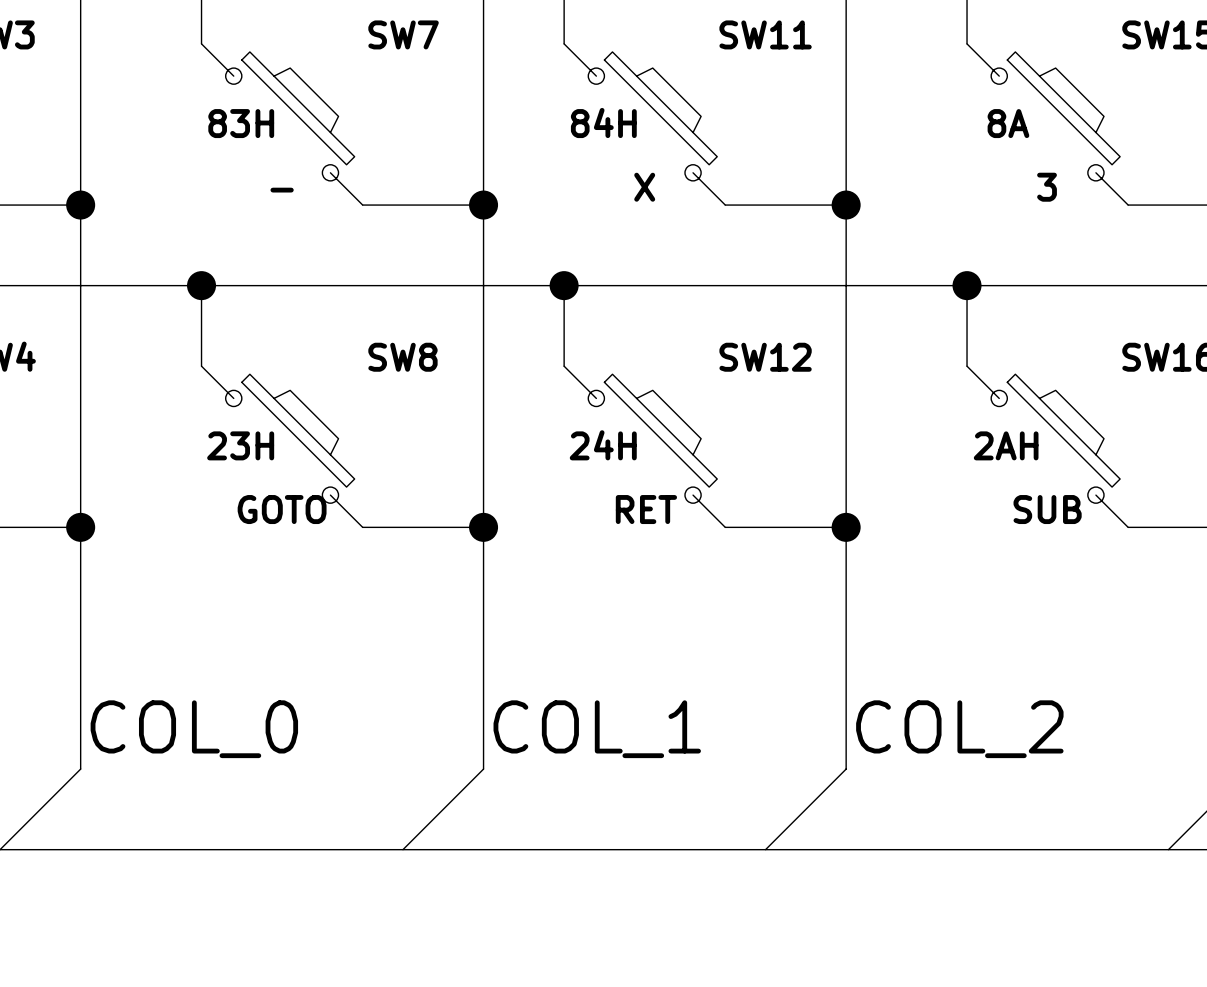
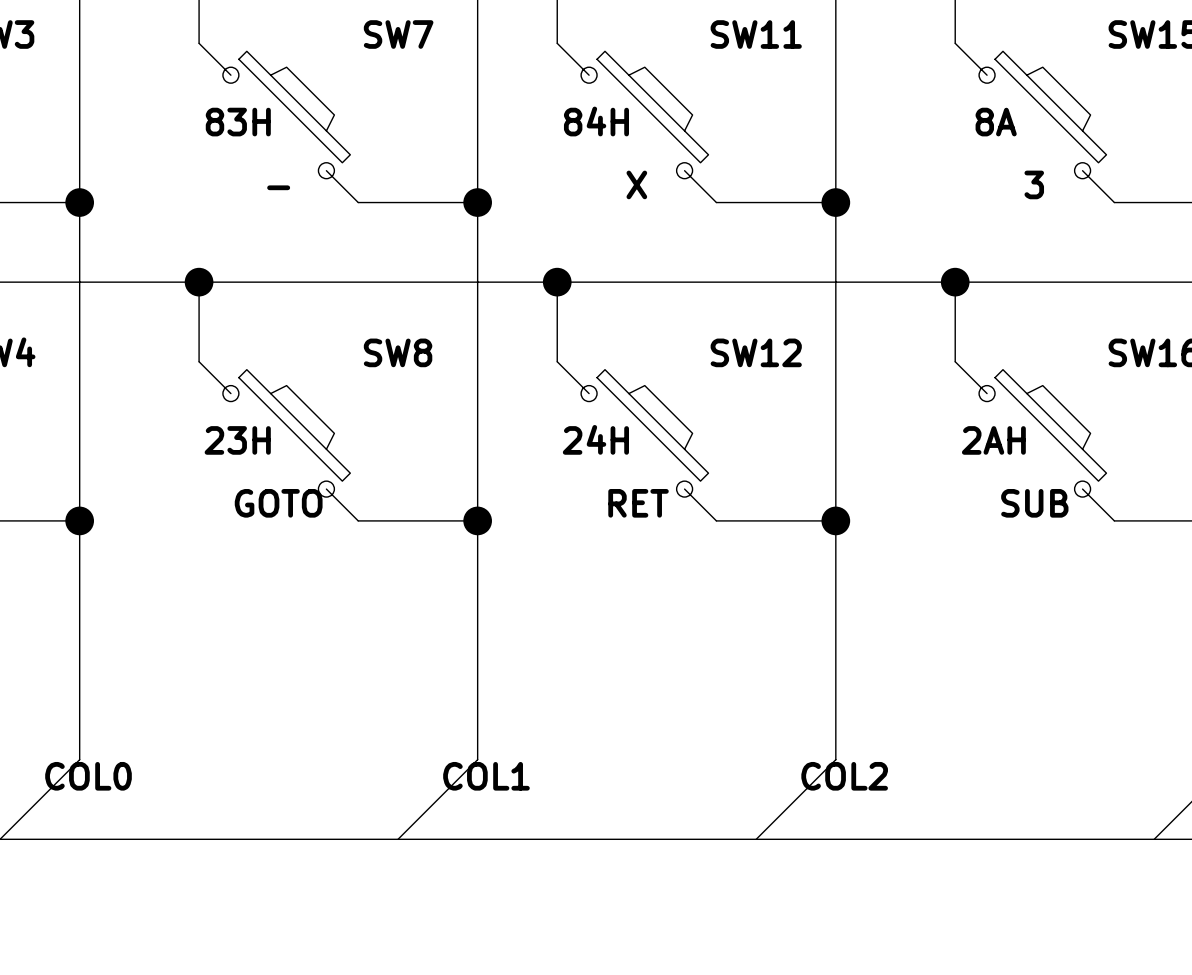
label: COL_0 (194, 729) -> COL0 (88, 776)
label: COL_1 (597, 729) -> COL1 (486, 776)
label: COL_2 (959, 729) -> COL2 (844, 776)

